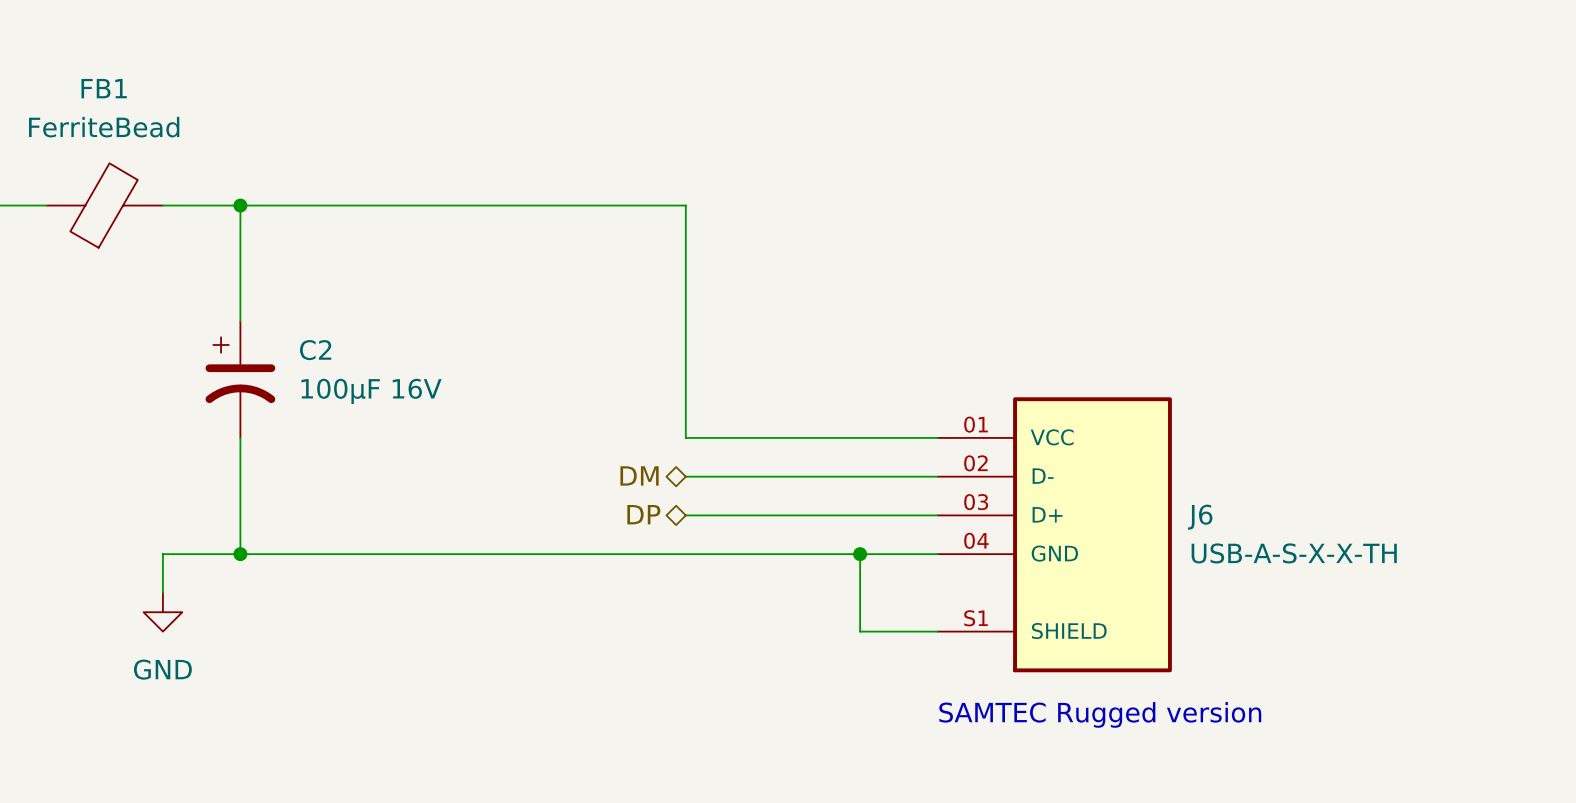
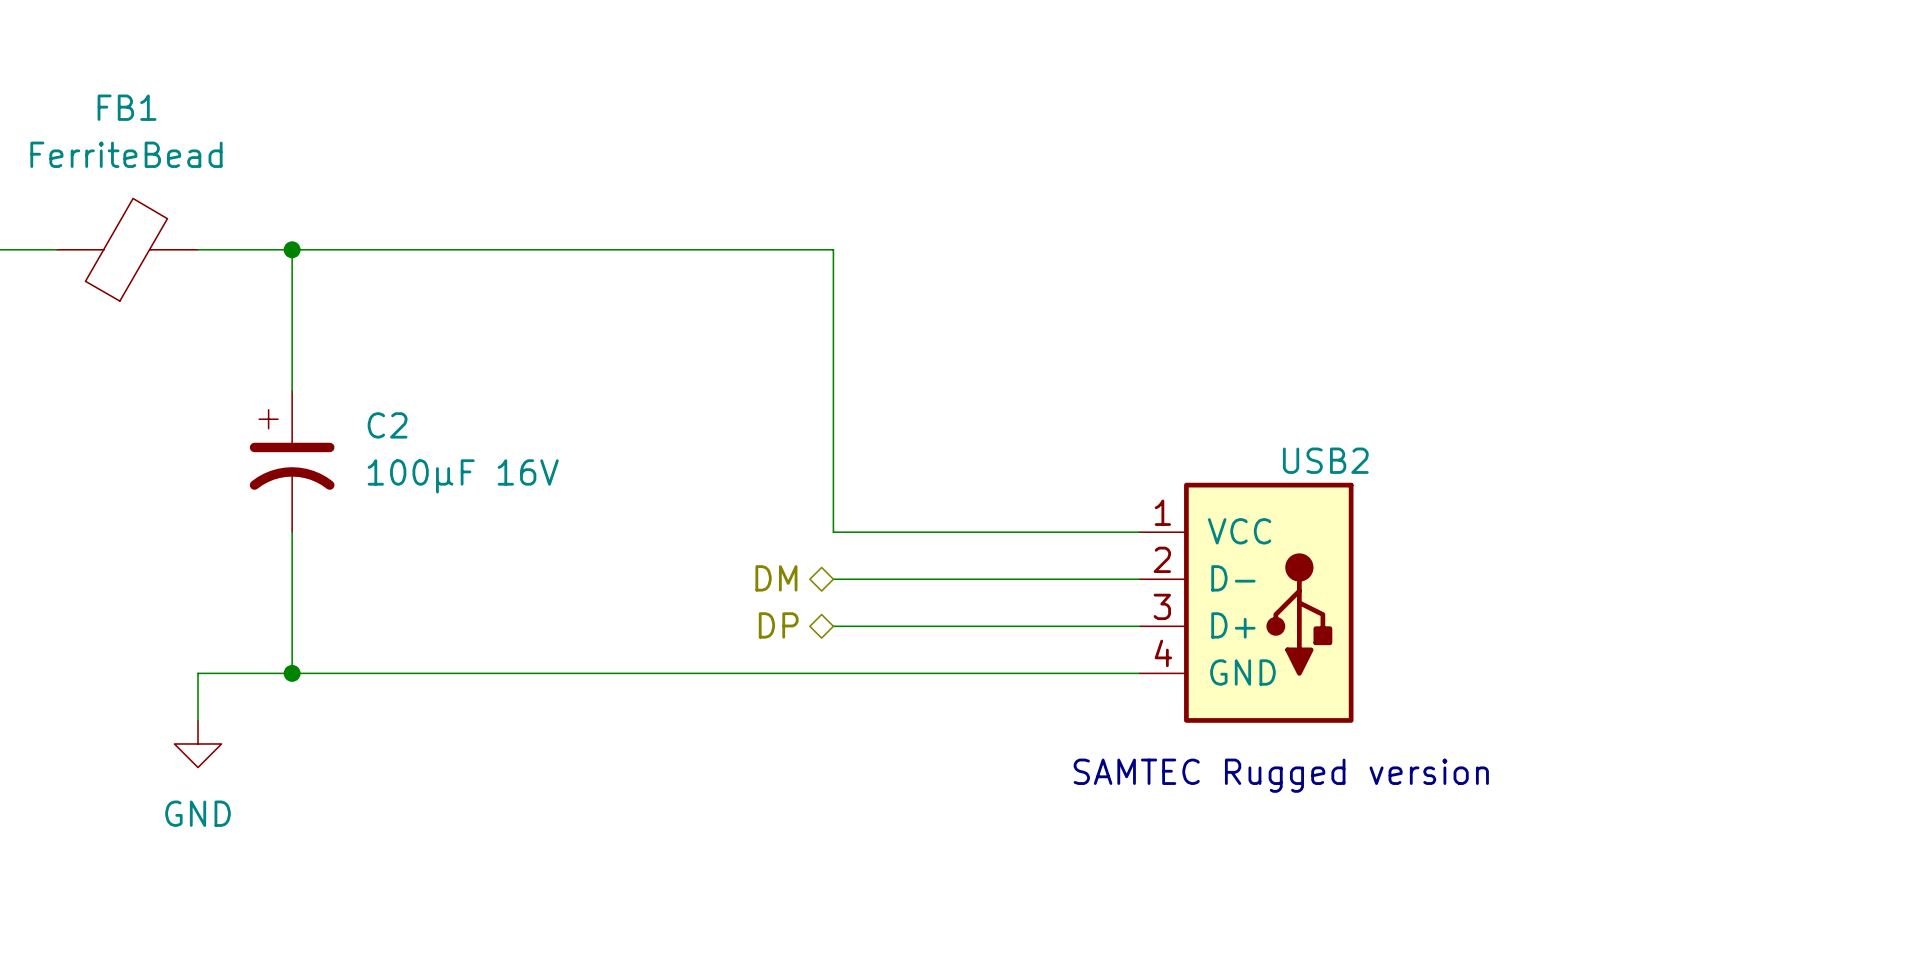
part: none -> USB2 (1246, 602)
J6: USB-A-S-X-X-TH (1054, 534) -> none
wire: (860, 554) (860, 631) (937, 631) -> none
junction: (860, 554) -> none
text position: SAMTEC Rugged version (1100, 714) -> SAMTEC Rugged version (1281, 775)

